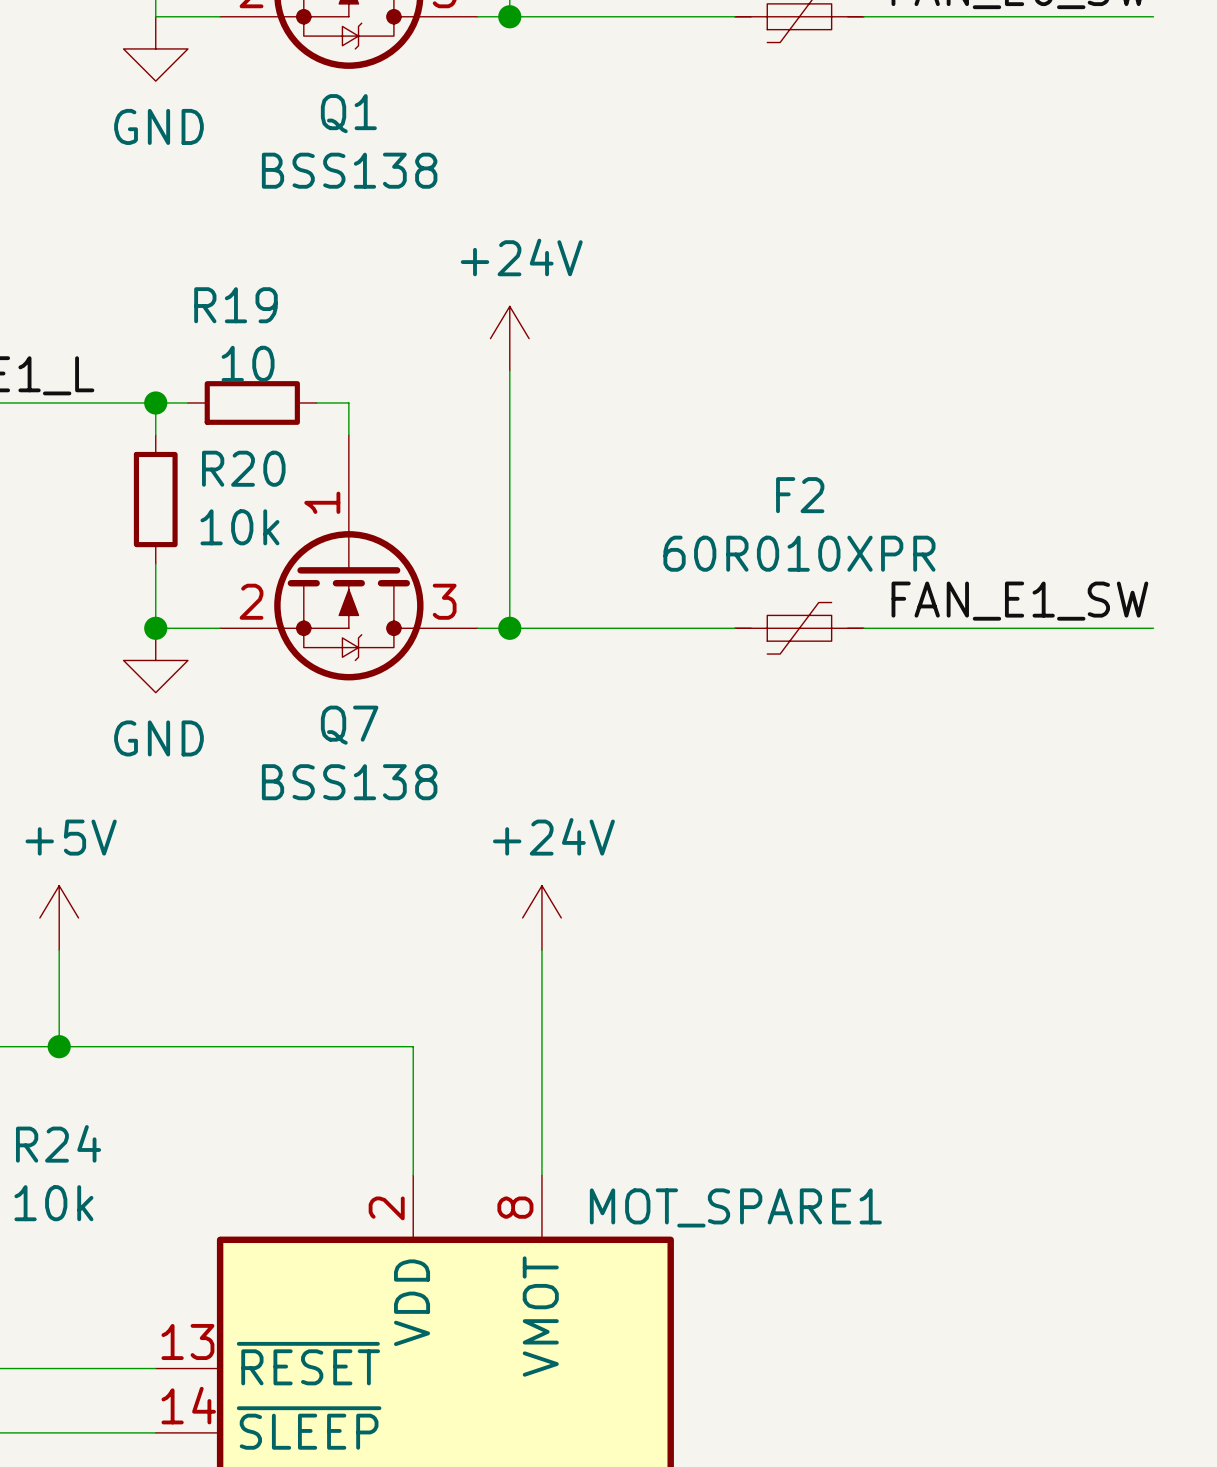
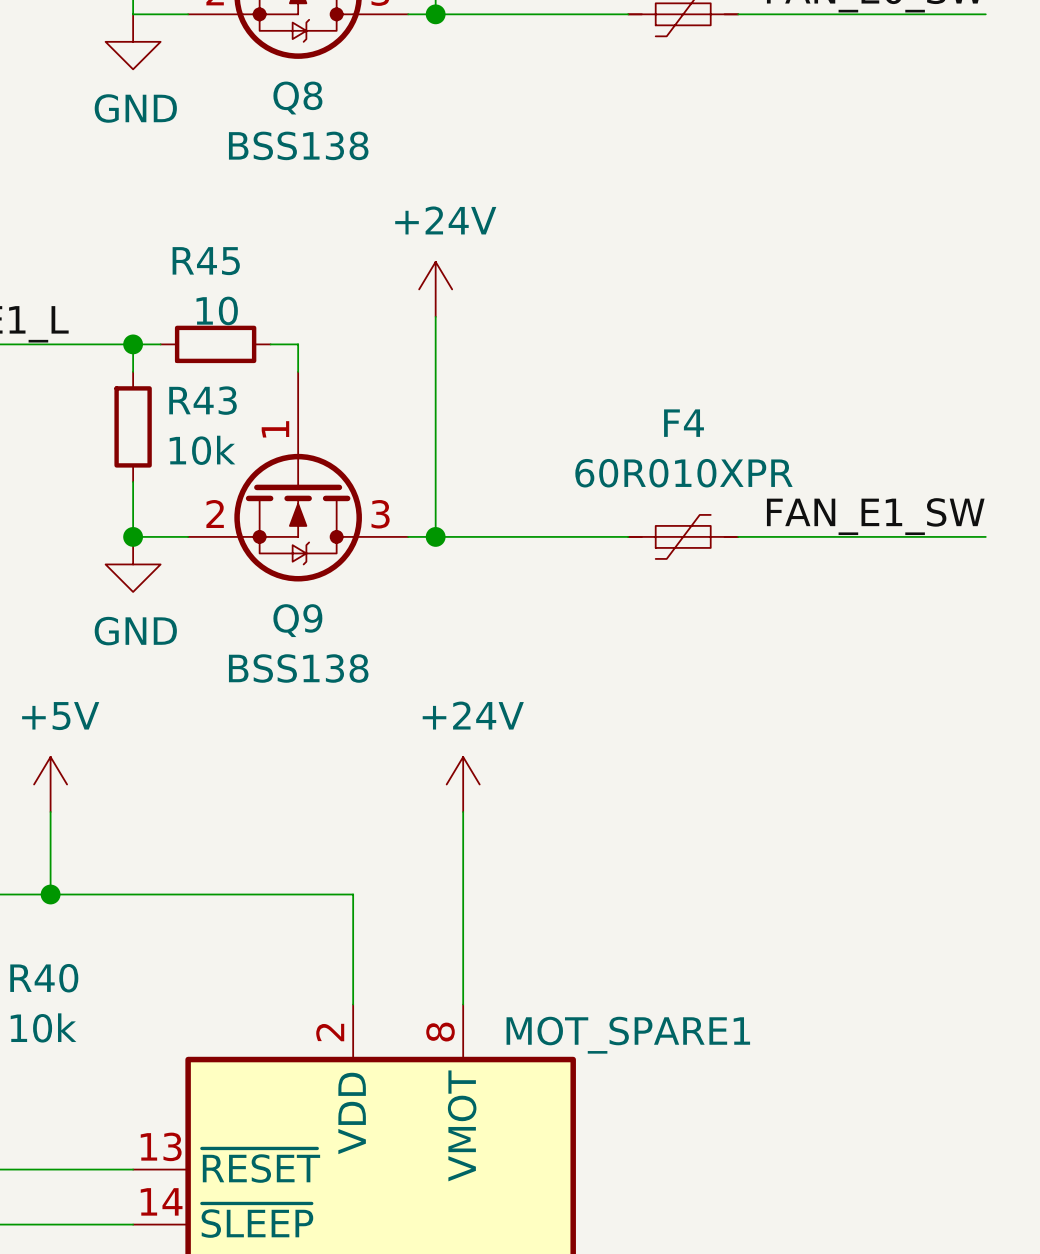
Q1 name: Q1 (348, 113) -> Q8 (297, 98)
R19 name: R19 (235, 305) -> R45 (206, 261)
R20 name: R20 (243, 468) -> R43 (203, 400)
F2 name: F2 (800, 495) -> F4 (684, 423)
Q7 name: Q7 (349, 725) -> Q9 (297, 620)
R24 name: R24 (58, 1143) -> R40 (44, 978)

